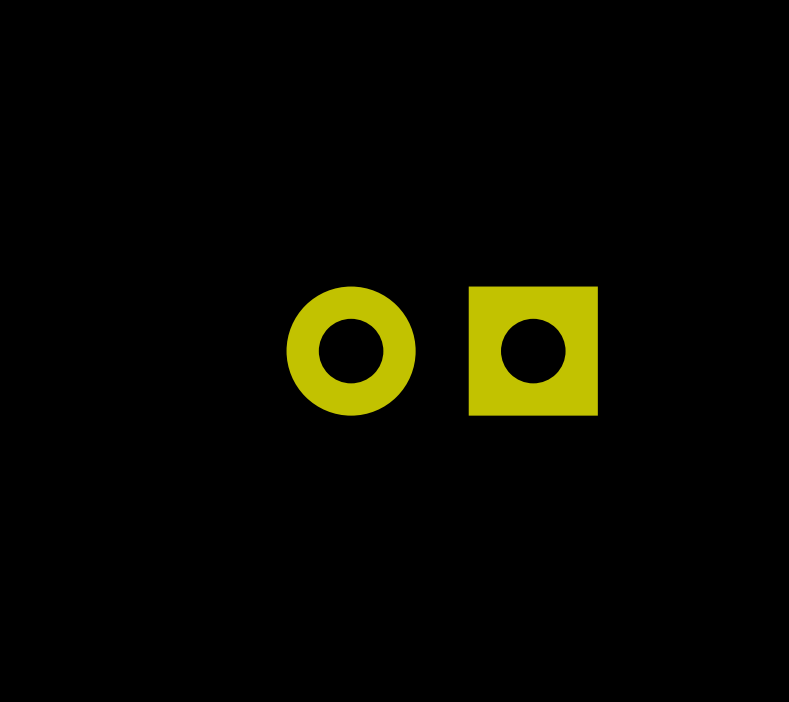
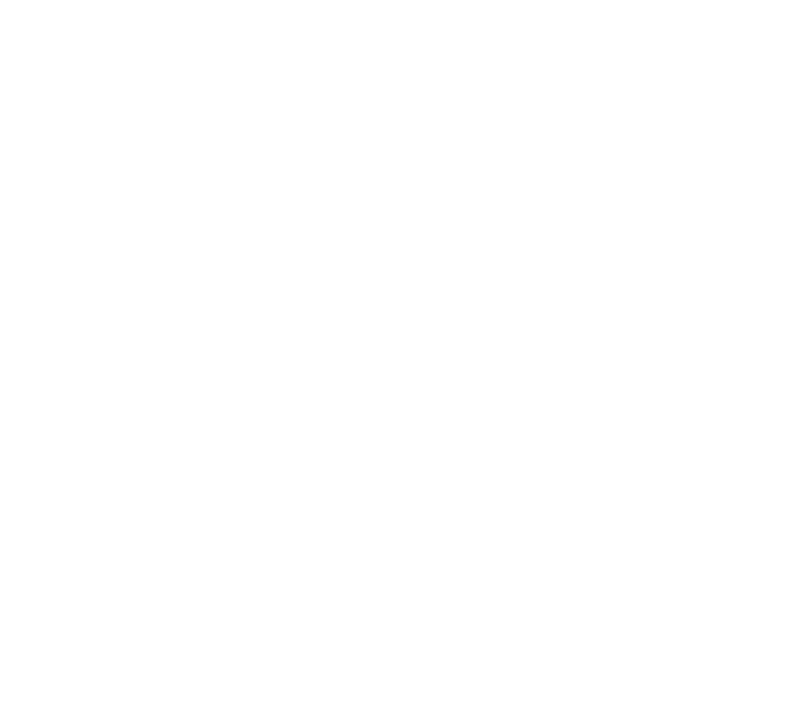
part: (442, 351) -> none

